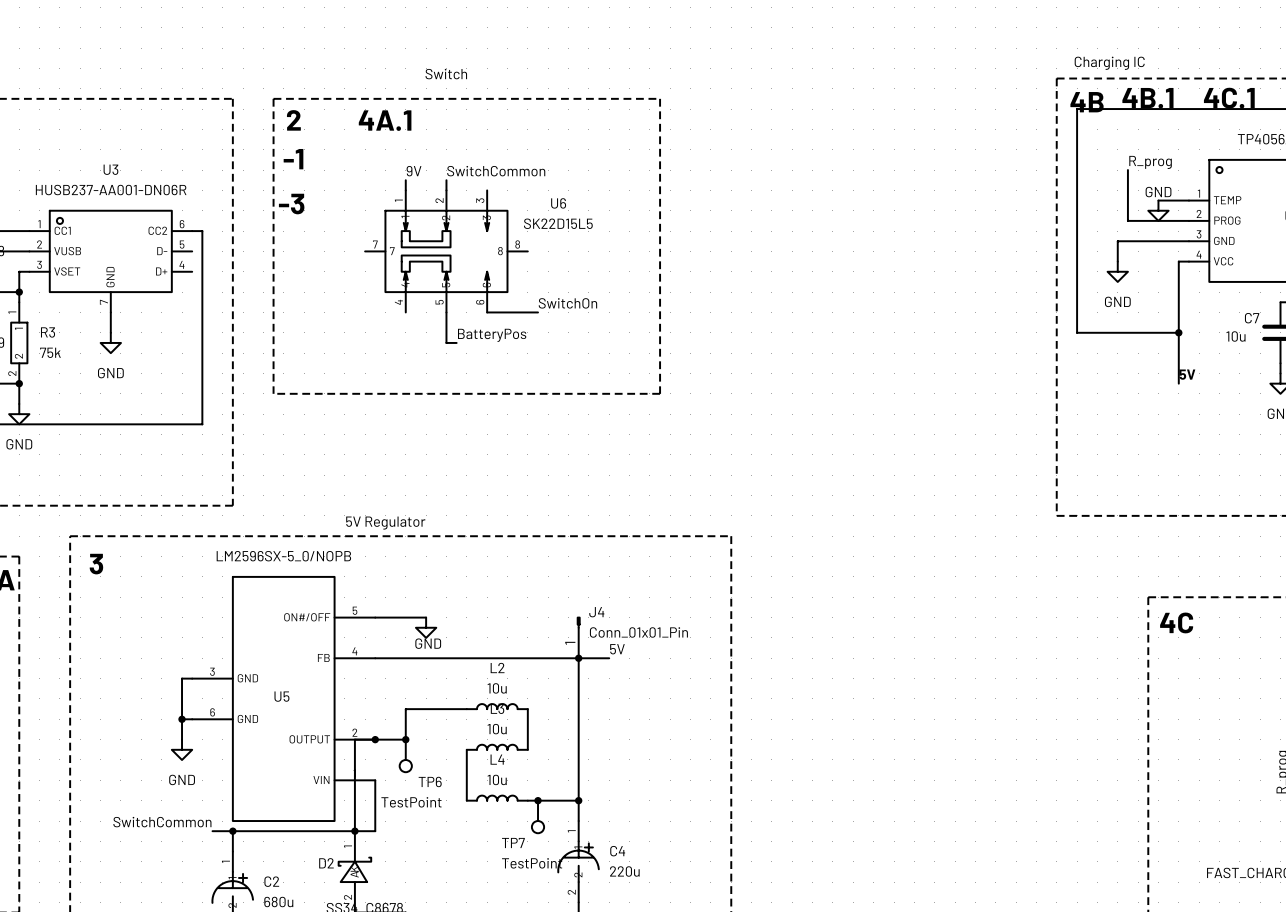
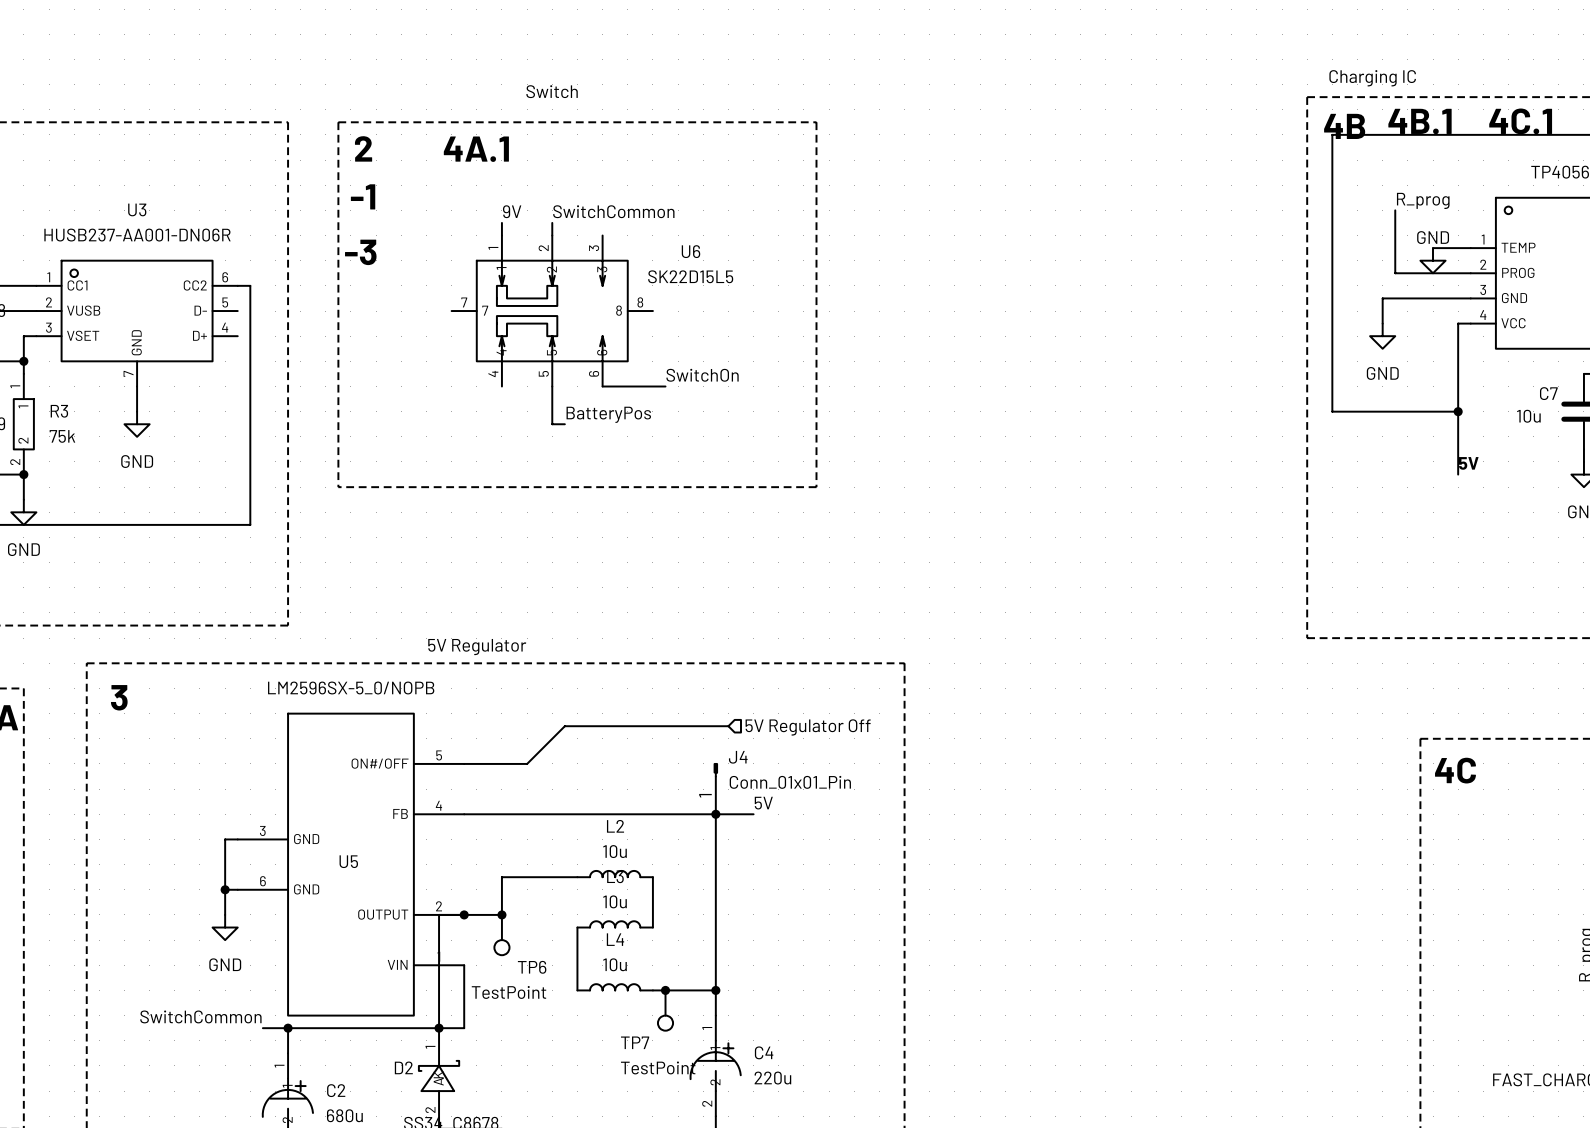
wire: none -> (728, 726) (564, 726) (527, 763)
hierarchical label: none -> 5V Regulator Off (808, 727)
power symbol: GND (426, 627) -> none

